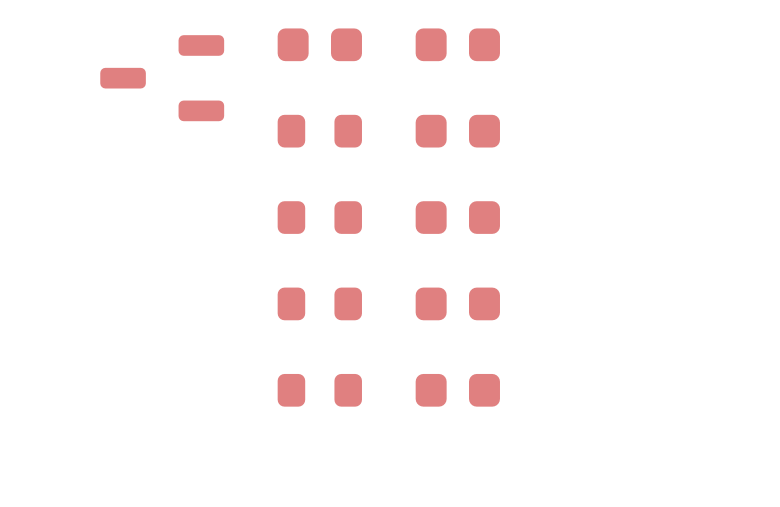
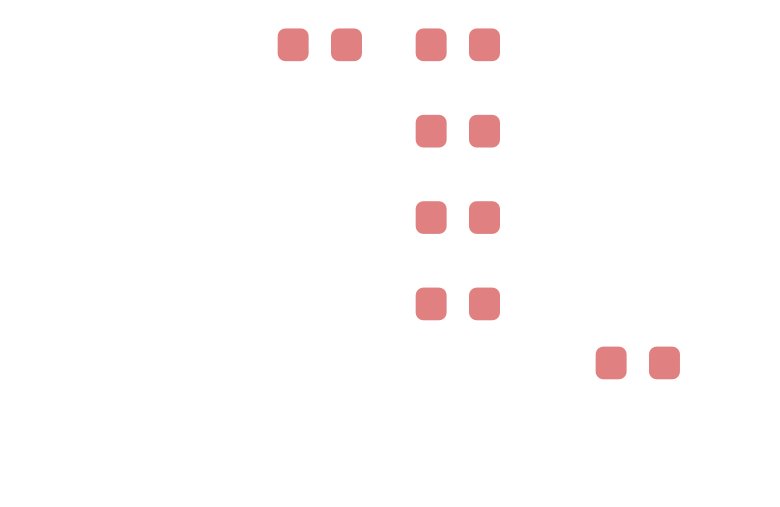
part: (162, 78) -> none
part: (319, 131) -> none
part: (319, 217) -> none
part: (319, 303) -> none
part: (319, 390) -> none
part position: (457, 390) -> (637, 362)

